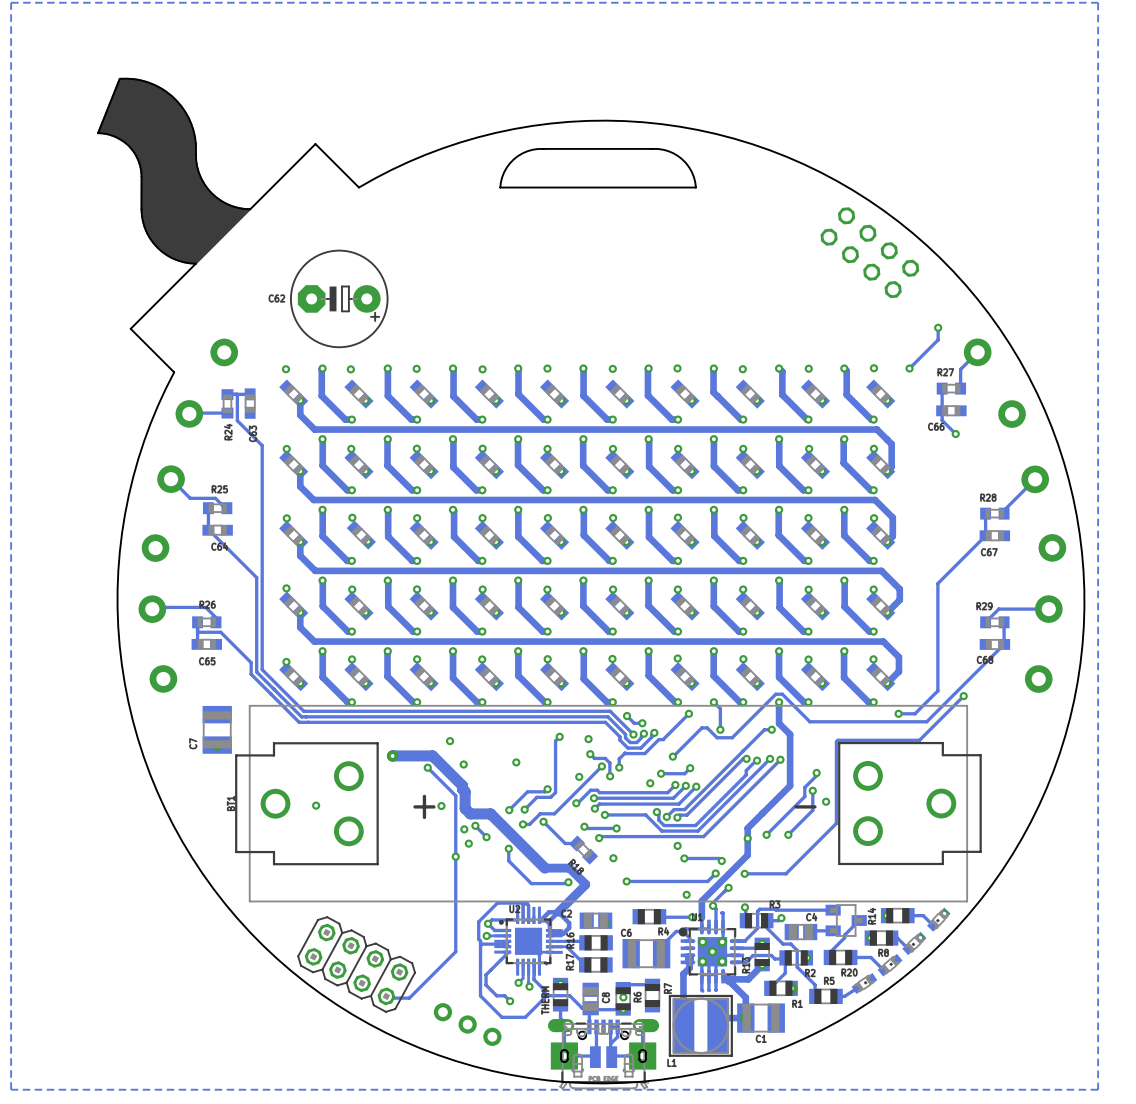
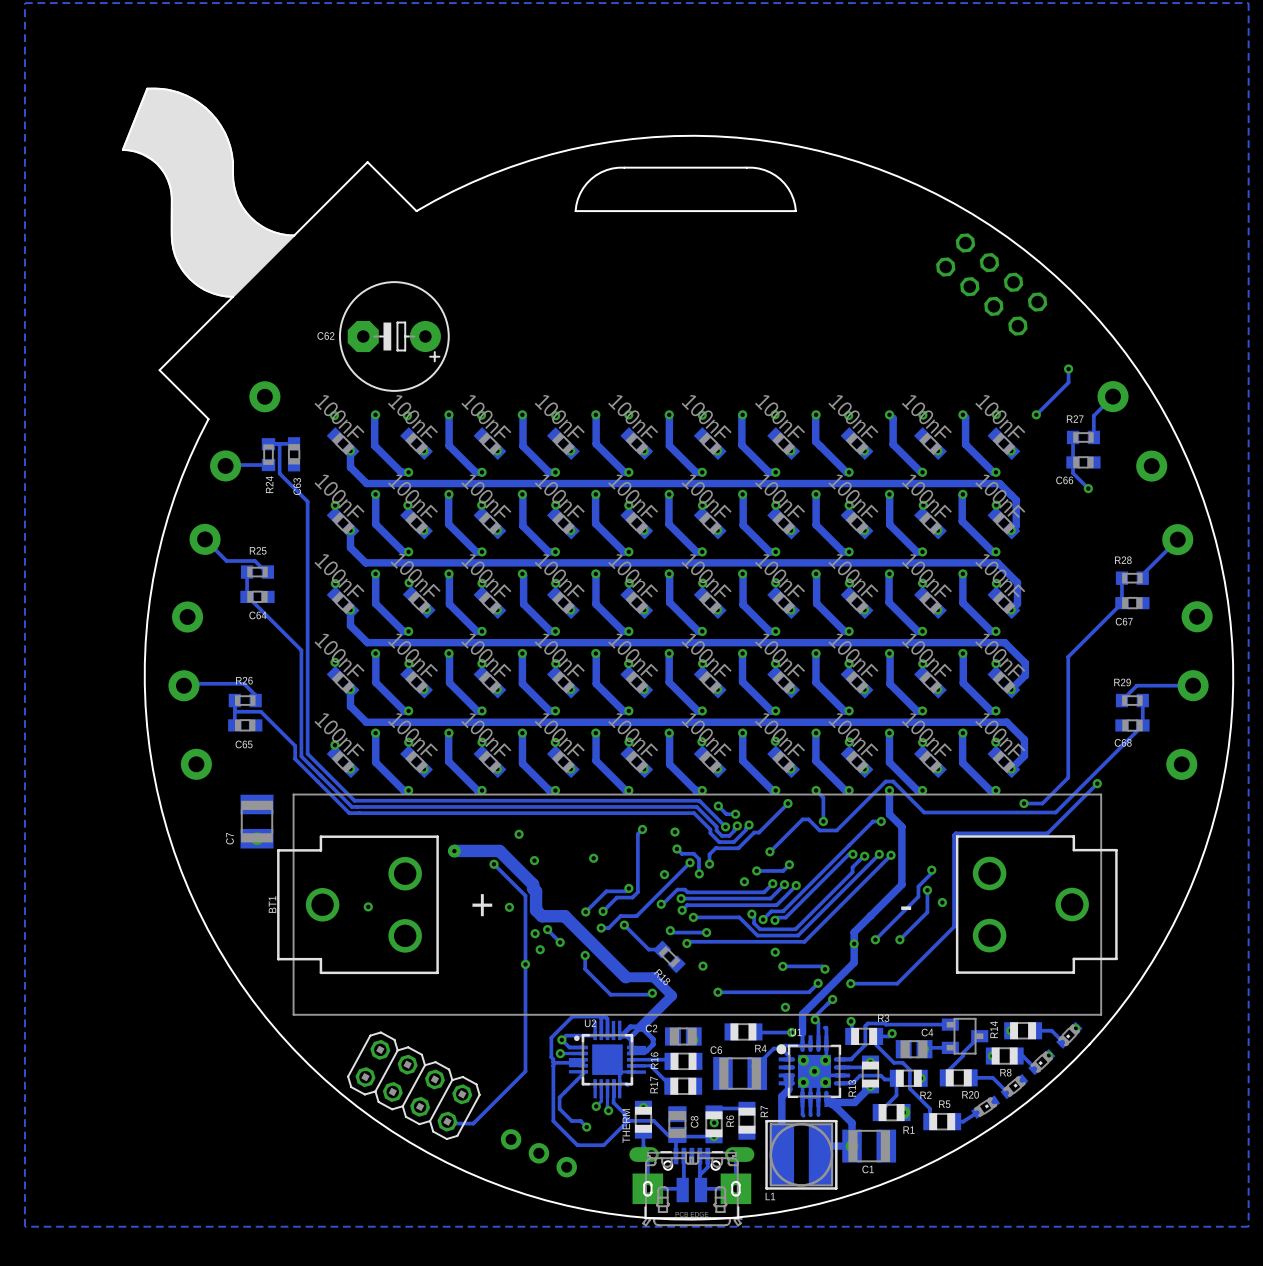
part value: none -> 100nF (339, 416)
part value: none -> 100nF (412, 416)
part value: none -> 100nF (486, 416)
part value: none -> 100nF (559, 416)
part value: none -> 100nF (633, 416)
part value: none -> 100nF (706, 416)
part value: none -> 100nF (780, 416)
part value: none -> 100nF (853, 416)
part value: none -> 100nF (926, 416)
part value: none -> 100nF (1000, 416)
part value: none -> 100nF (339, 496)
part value: none -> 100nF (412, 496)
part value: none -> 100nF (486, 496)
part value: none -> 100nF (559, 496)
part value: none -> 100nF (633, 496)
part value: none -> 100nF (706, 496)
part value: none -> 100nF (780, 496)
part value: none -> 100nF (853, 496)
part value: none -> 100nF (926, 496)
part value: none -> 100nF (1000, 496)
part value: none -> 100nF (415, 575)
part value: none -> 100nF (339, 575)
part value: none -> 100nF (486, 575)
part value: none -> 100nF (559, 575)
part value: none -> 100nF (633, 575)
part value: none -> 100nF (706, 575)
part value: none -> 100nF (780, 575)
part value: none -> 100nF (853, 575)
part value: none -> 100nF (926, 575)
part value: none -> 100nF (1000, 575)
part value: none -> 100nF (339, 655)
part value: none -> 100nF (412, 655)
part value: none -> 100nF (486, 655)
part value: none -> 100nF (559, 655)
part value: none -> 100nF (633, 655)
part value: none -> 100nF (706, 655)
part value: none -> 100nF (780, 655)
part value: none -> 100nF (853, 655)
part value: none -> 100nF (926, 655)
part value: none -> 100nF (1000, 655)
part value: none -> 100nF (339, 734)
part value: none -> 100nF (412, 734)
part value: none -> 100nF (486, 734)
part value: none -> 100nF (559, 734)
part value: none -> 100nF (633, 734)
part value: none -> 100nF (706, 734)
part value: none -> 100nF (780, 734)
part value: none -> 100nF (853, 734)
part value: none -> 100nF (926, 734)
part value: none -> 100nF (1000, 734)

